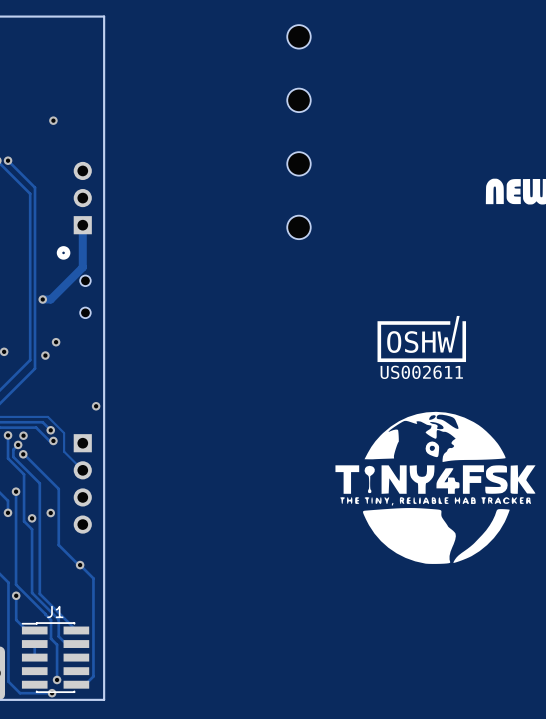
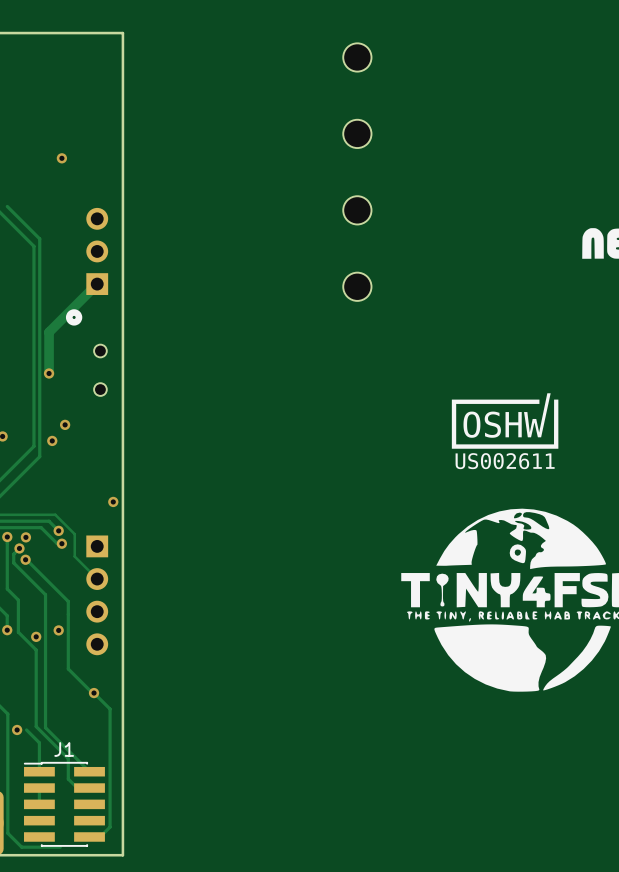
via: (8, 160) -> none
track: (82, 225) (82, 267) (50, 299) (42, 299) -> (97, 284) (49, 332) (49, 373)
track: (8, 458) (24, 474) (24, 521) -> (7, 564) (7, 588) (18, 600) (18, 632) (26, 640)
track: (16, 491) (16, 584) (51, 620) (51, 638) (57, 644) (57, 679) -> none
via: (16, 491) -> none
track: (16, 595) (16, 619) (26, 630) (34, 630) -> (26, 729) (39, 742) (39, 771)
via: (57, 679) -> none
via: (52, 693) -> none

